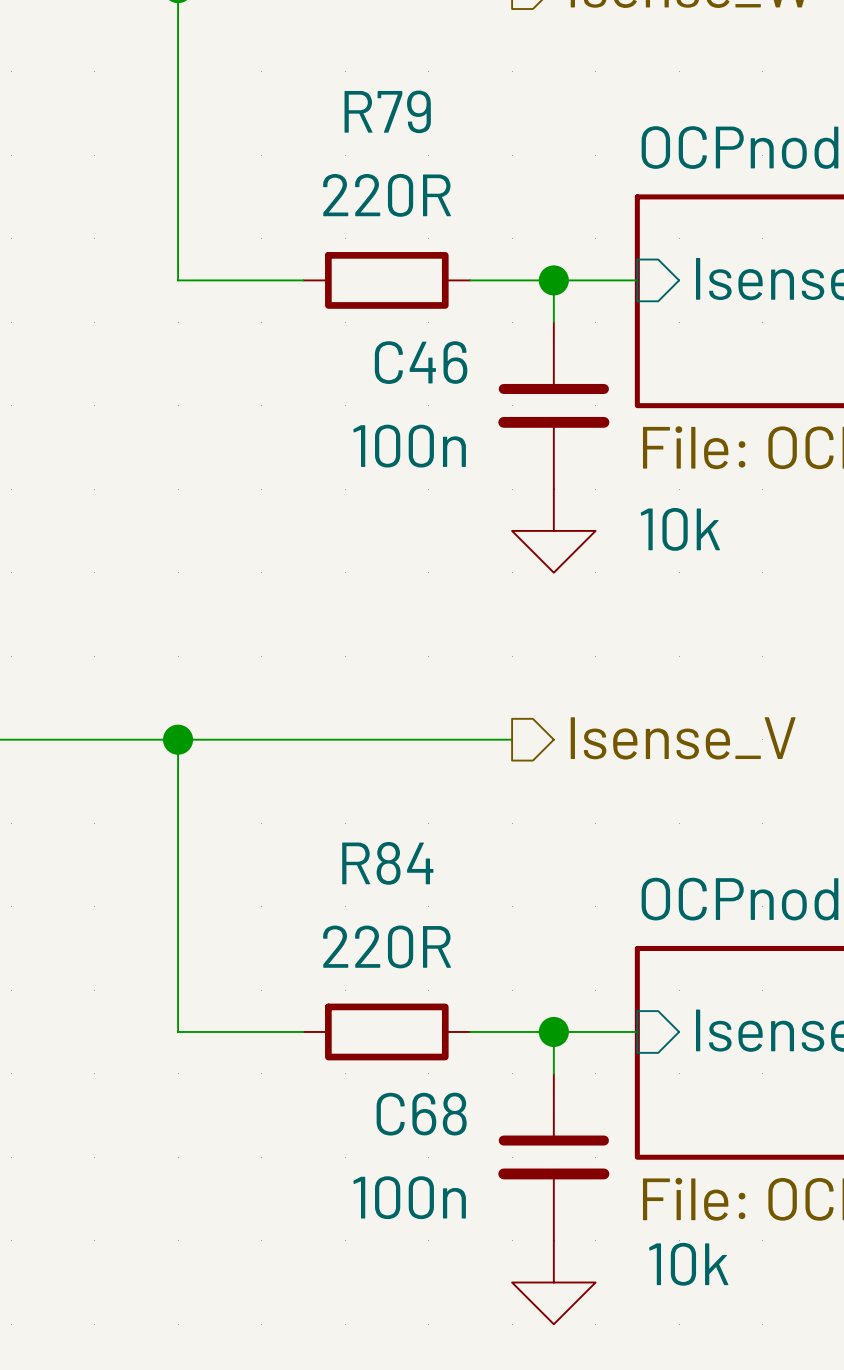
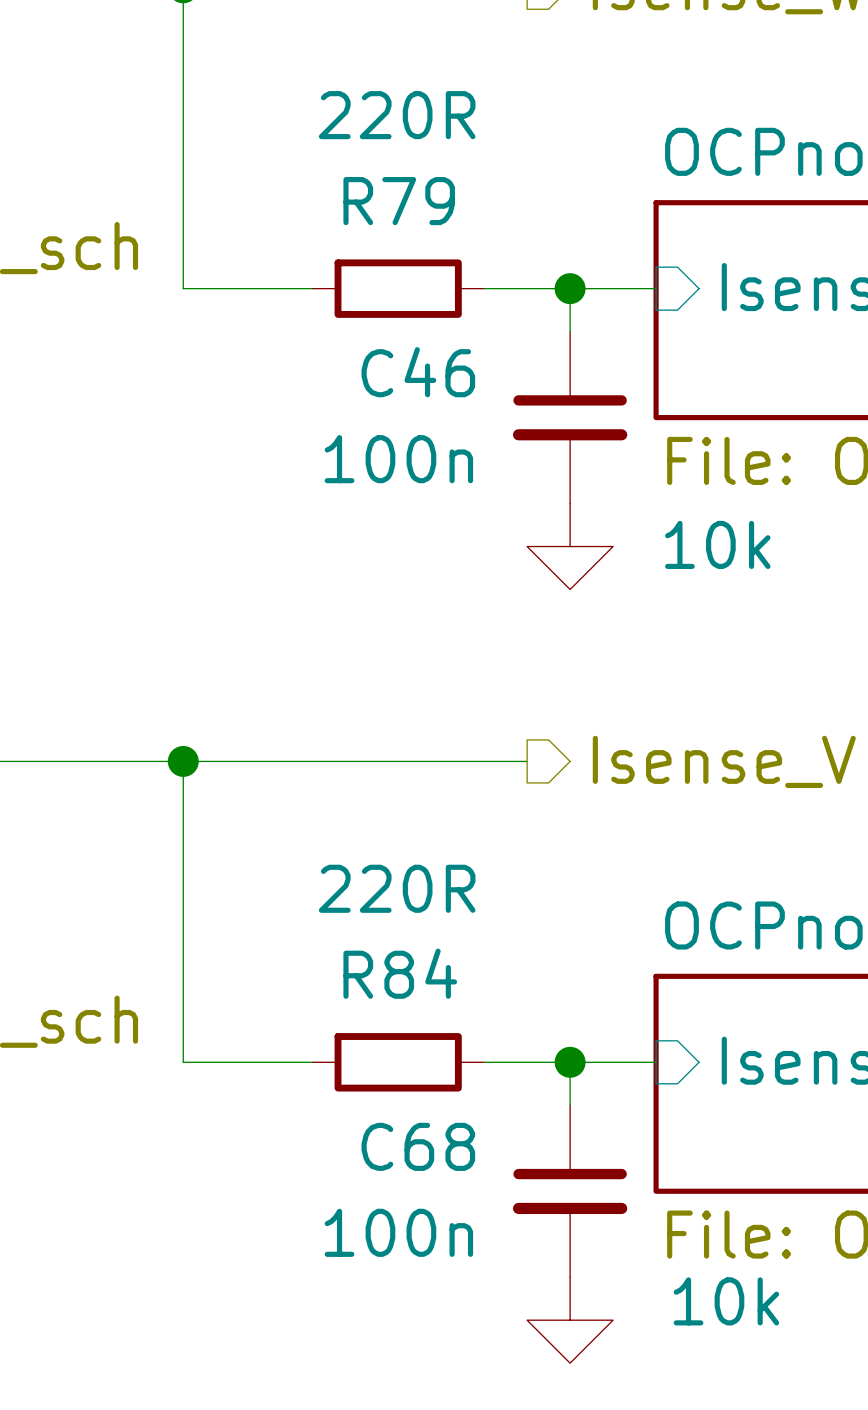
R79 name position: R79 (387, 111) -> R79 (399, 201)
R79 value position: 220R (387, 195) -> 220R (397, 115)
R84 name position: R84 (387, 863) -> R84 (400, 973)
R84 value position: 220R (387, 946) -> 220R (397, 888)

